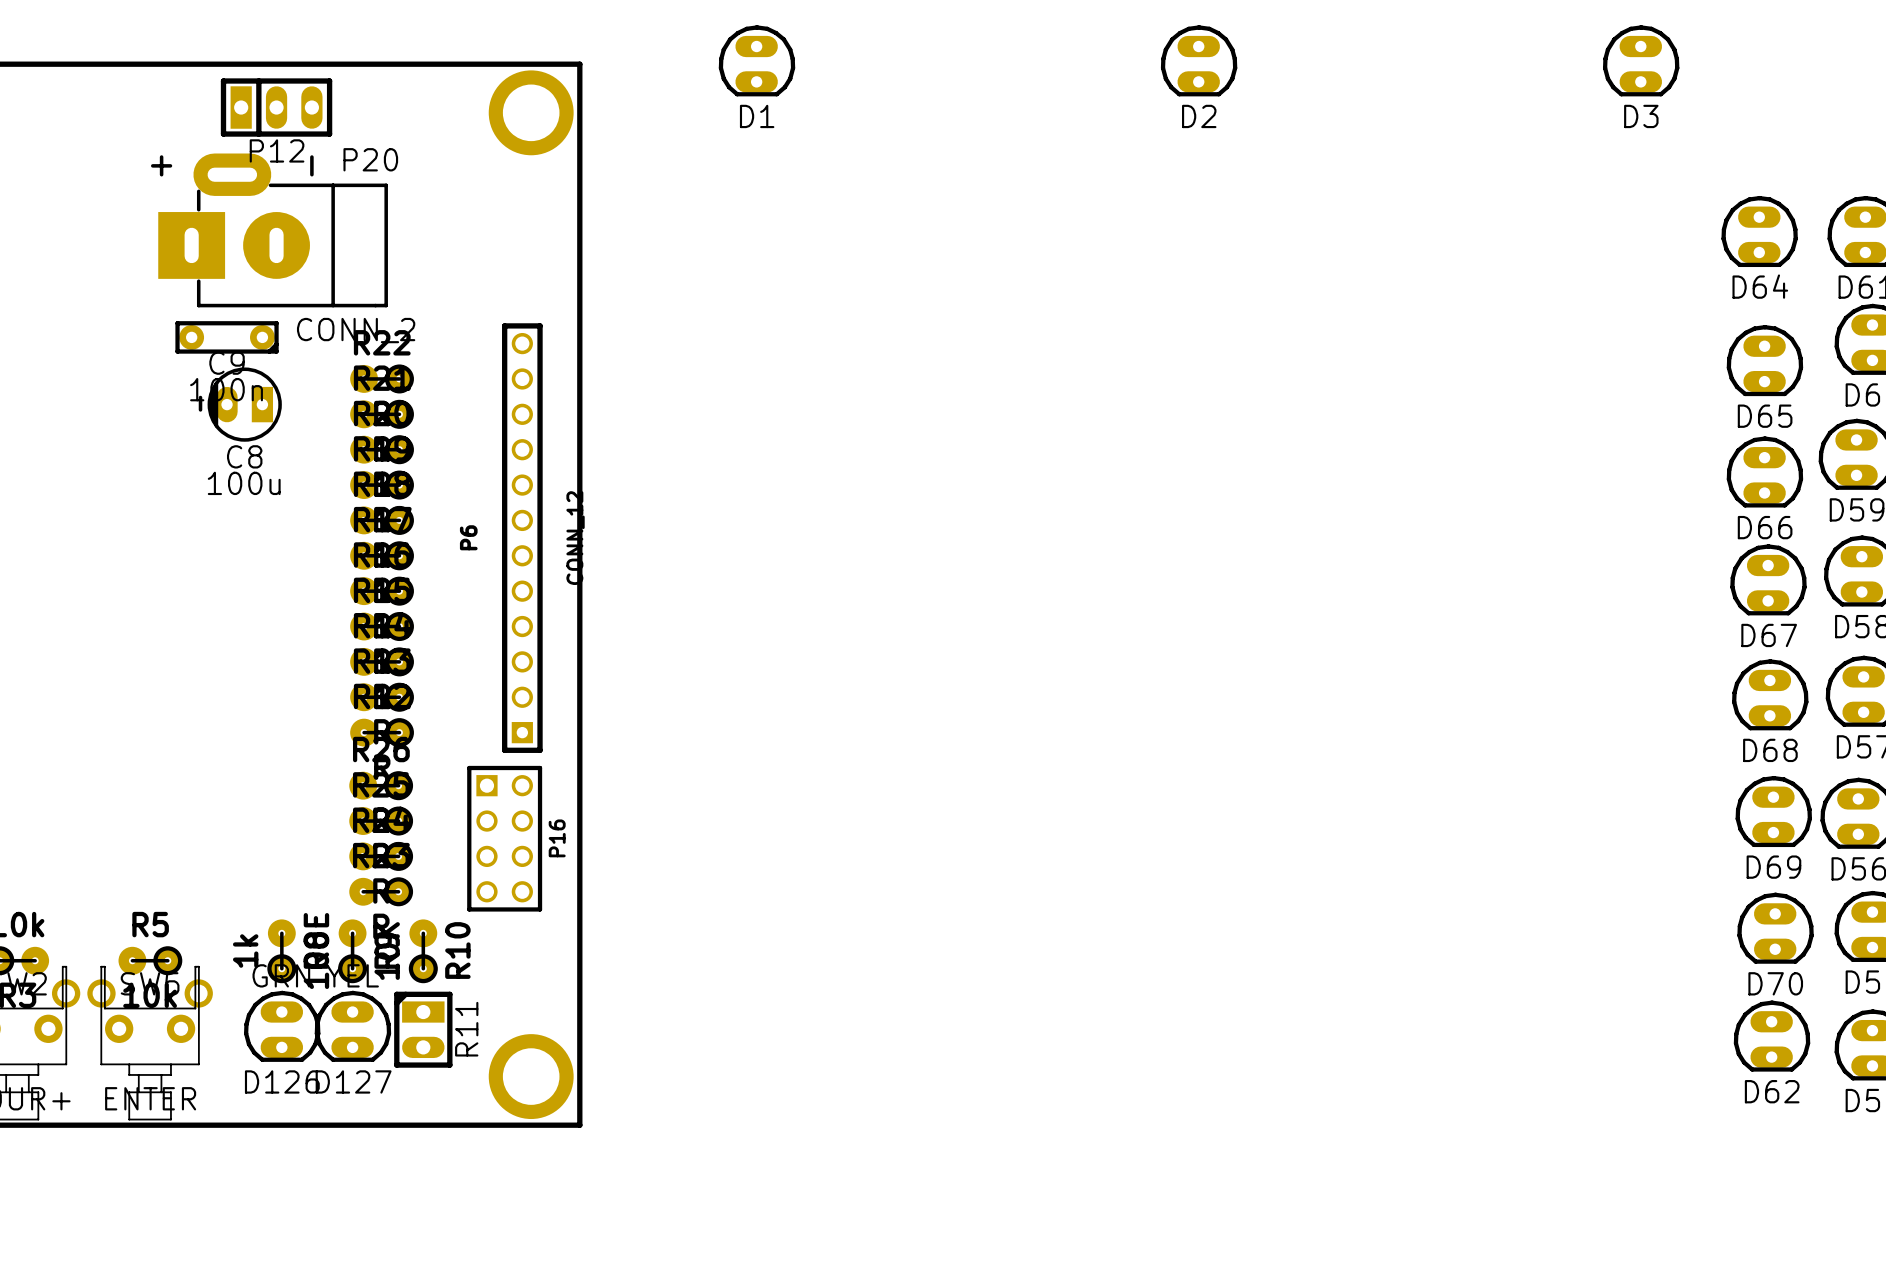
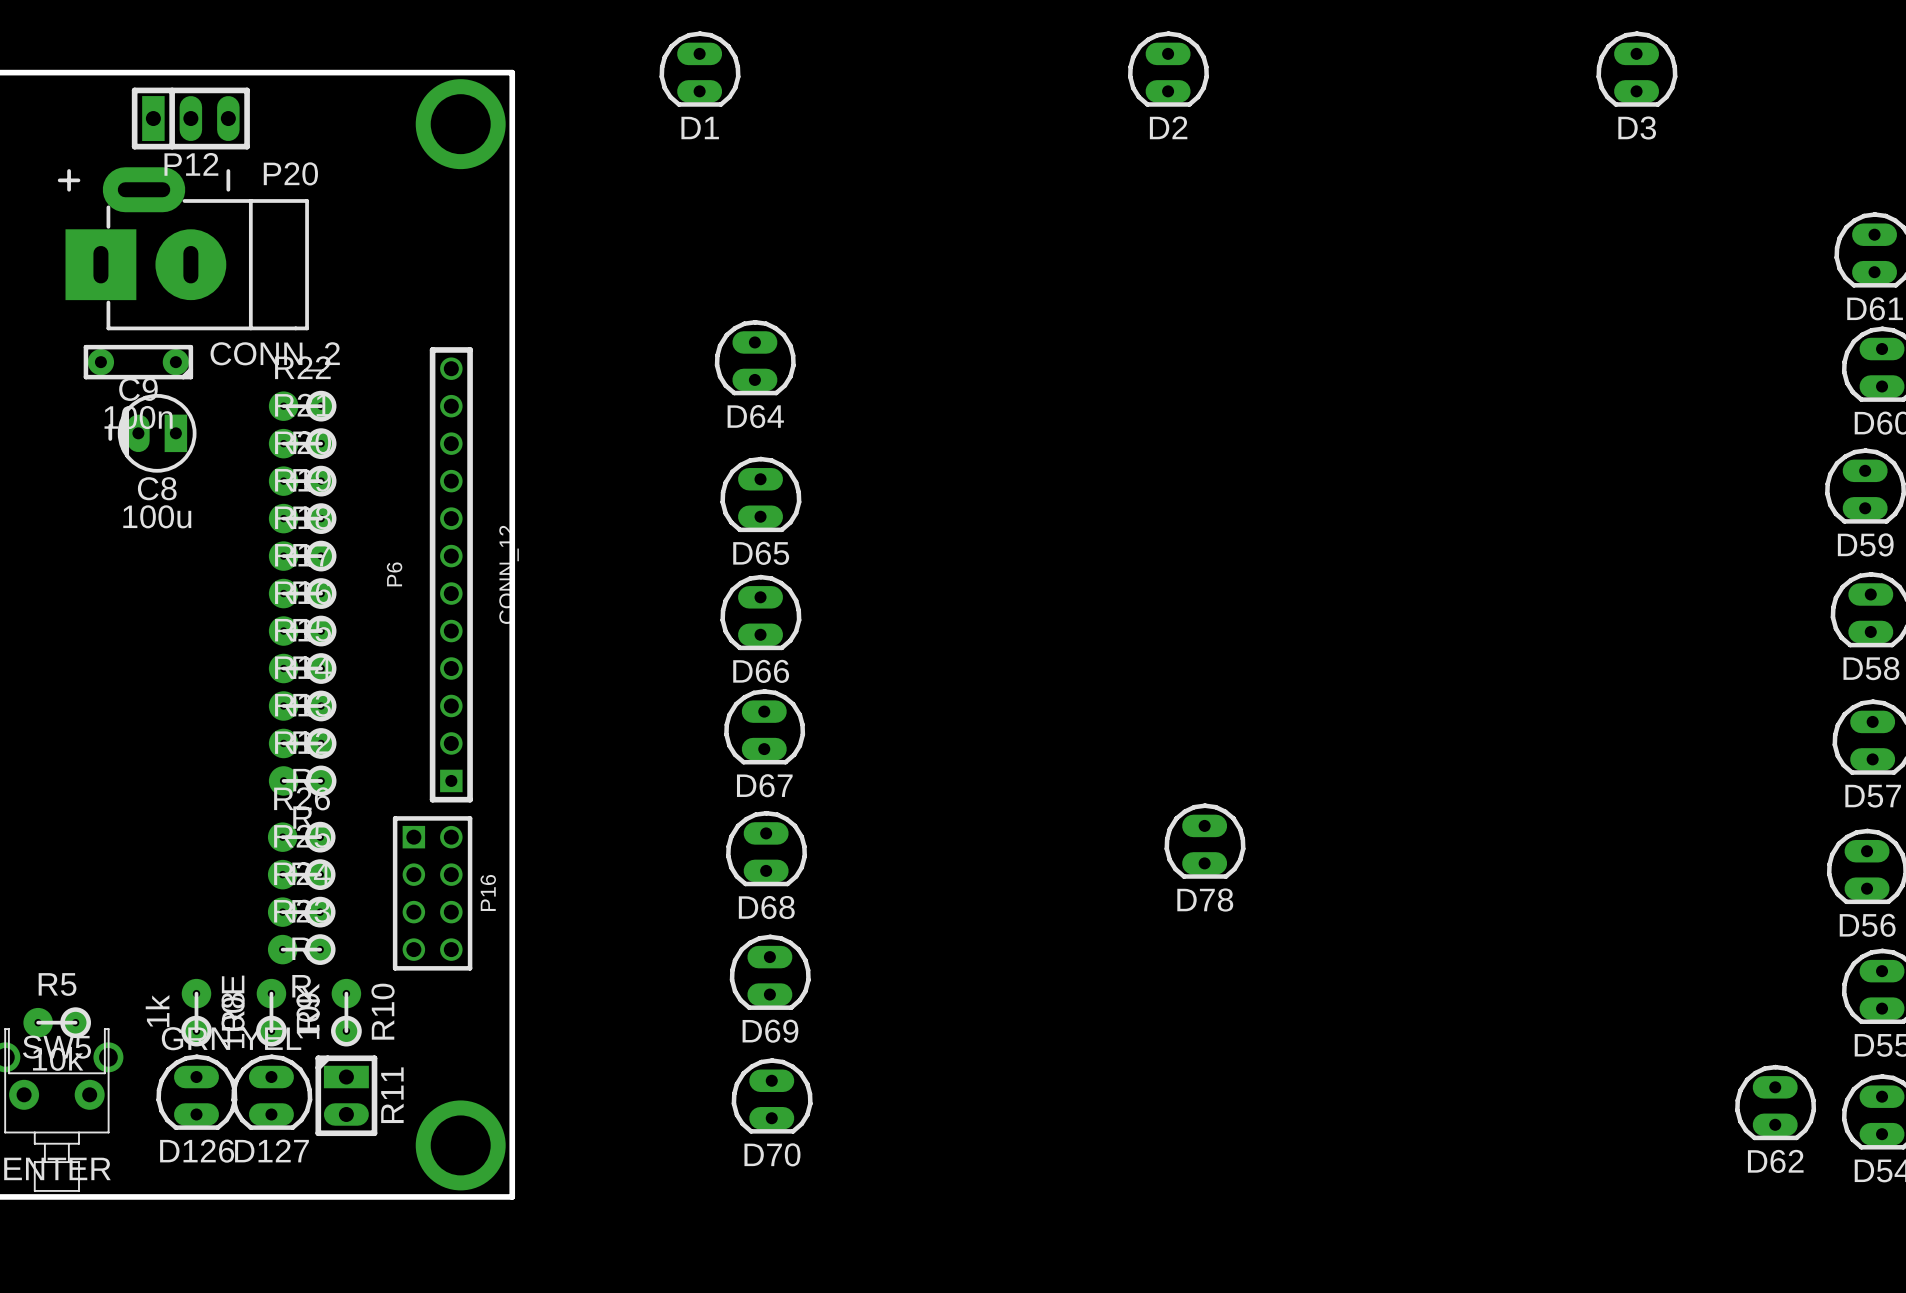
D64 position: (1759, 231) -> (755, 357)
D65 position: (1764, 360) -> (760, 494)
D66 position: (1764, 471) -> (760, 612)
D67 position: (1768, 579) -> (764, 726)
D68 position: (1770, 694) -> (766, 848)
D78: none -> (1205, 841)
D69 position: (1773, 811) -> (770, 972)
D70 position: (1775, 928) -> (772, 1095)

